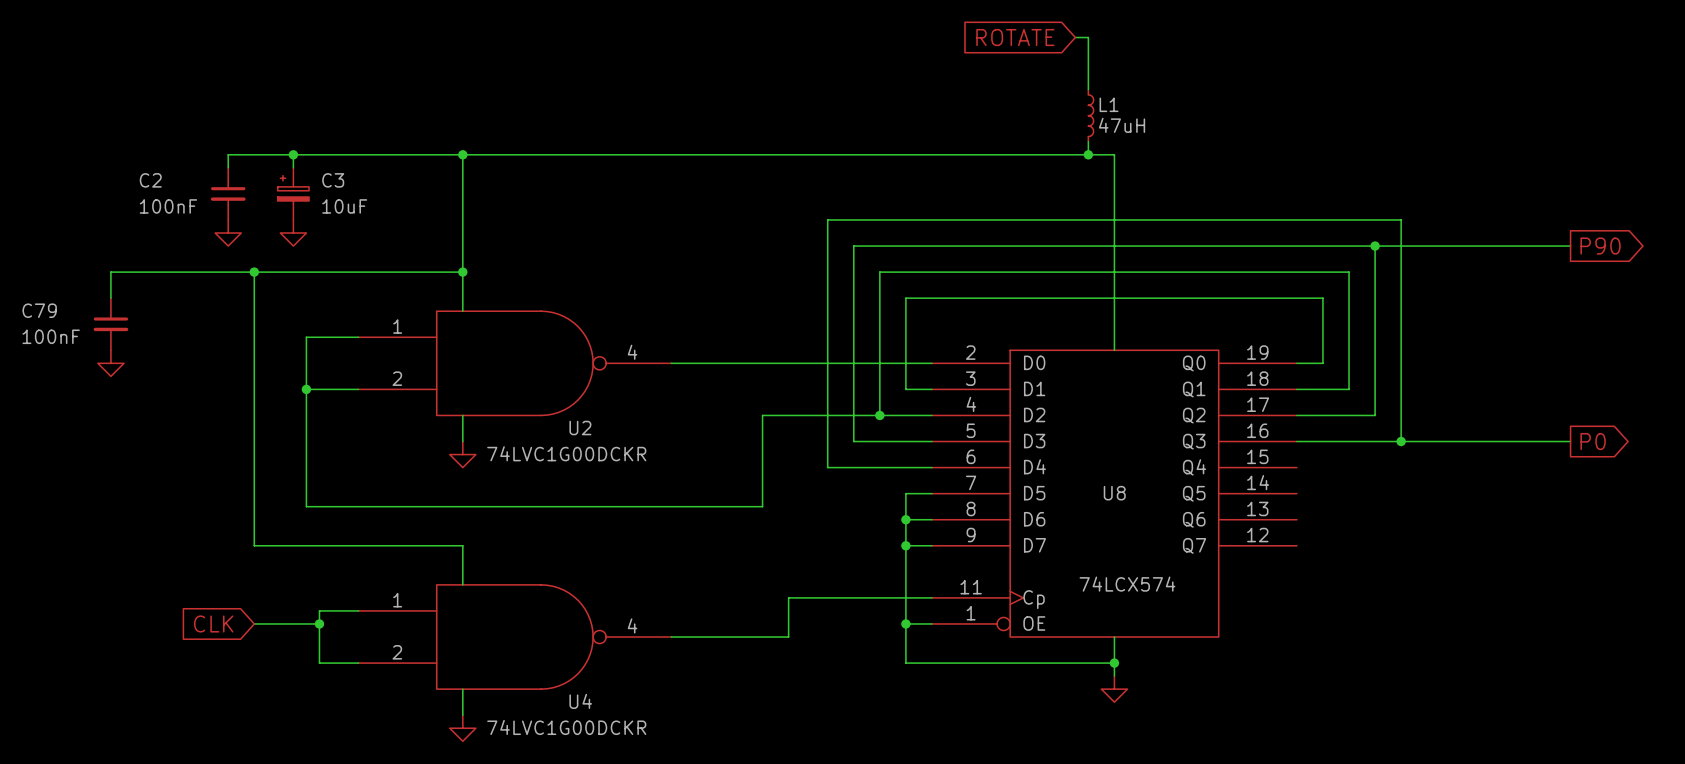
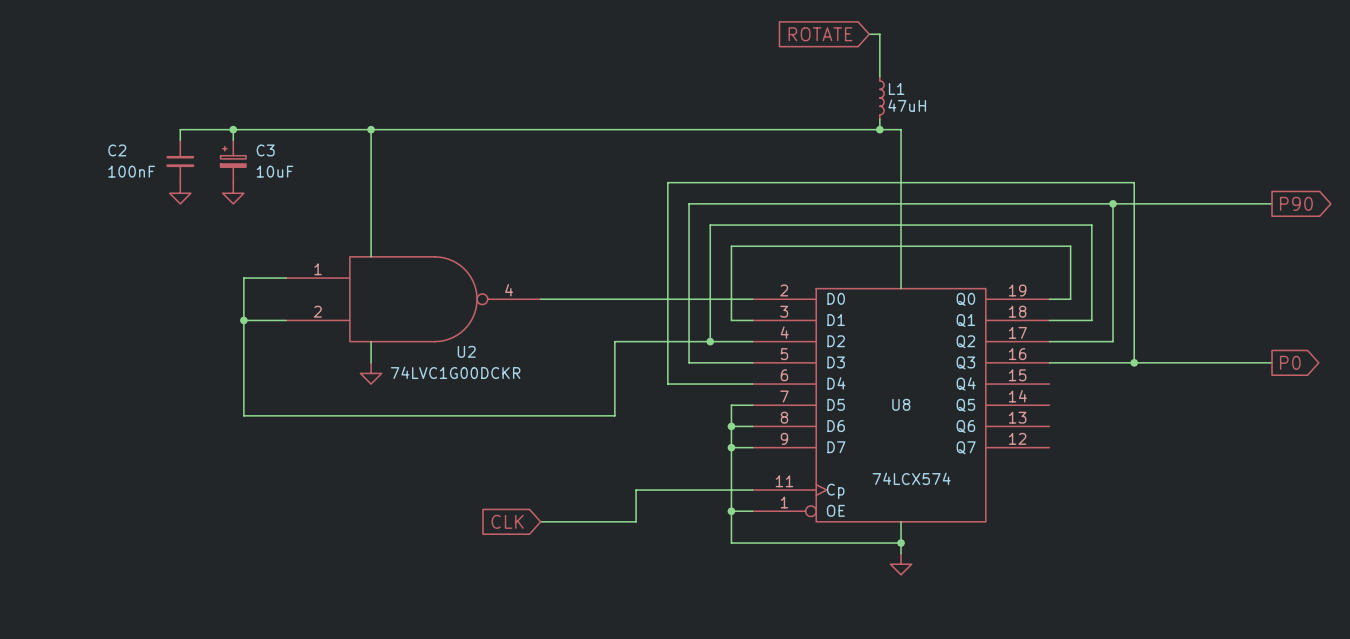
wire: (254, 272) (254, 545) (462, 545) (462, 584) -> none
junction: (254, 272) -> none
wire: (462, 272) (110, 272) (110, 298) -> none
junction: (462, 272) -> none
C79: 100nF (110, 324) -> none
power symbol: (110, 363) -> none
wire: (358, 610) (319, 610) (319, 663) (358, 663) -> none
global label: CLK (213, 623) -> none
wire: (254, 623) (319, 623) -> none
junction: (319, 623) -> none
U4: 74LVC1G00DCKR (514, 637) -> none
global label: none -> CLK (507, 521)
wire: (462, 689) (462, 715) -> none
power symbol: (462, 728) -> none

